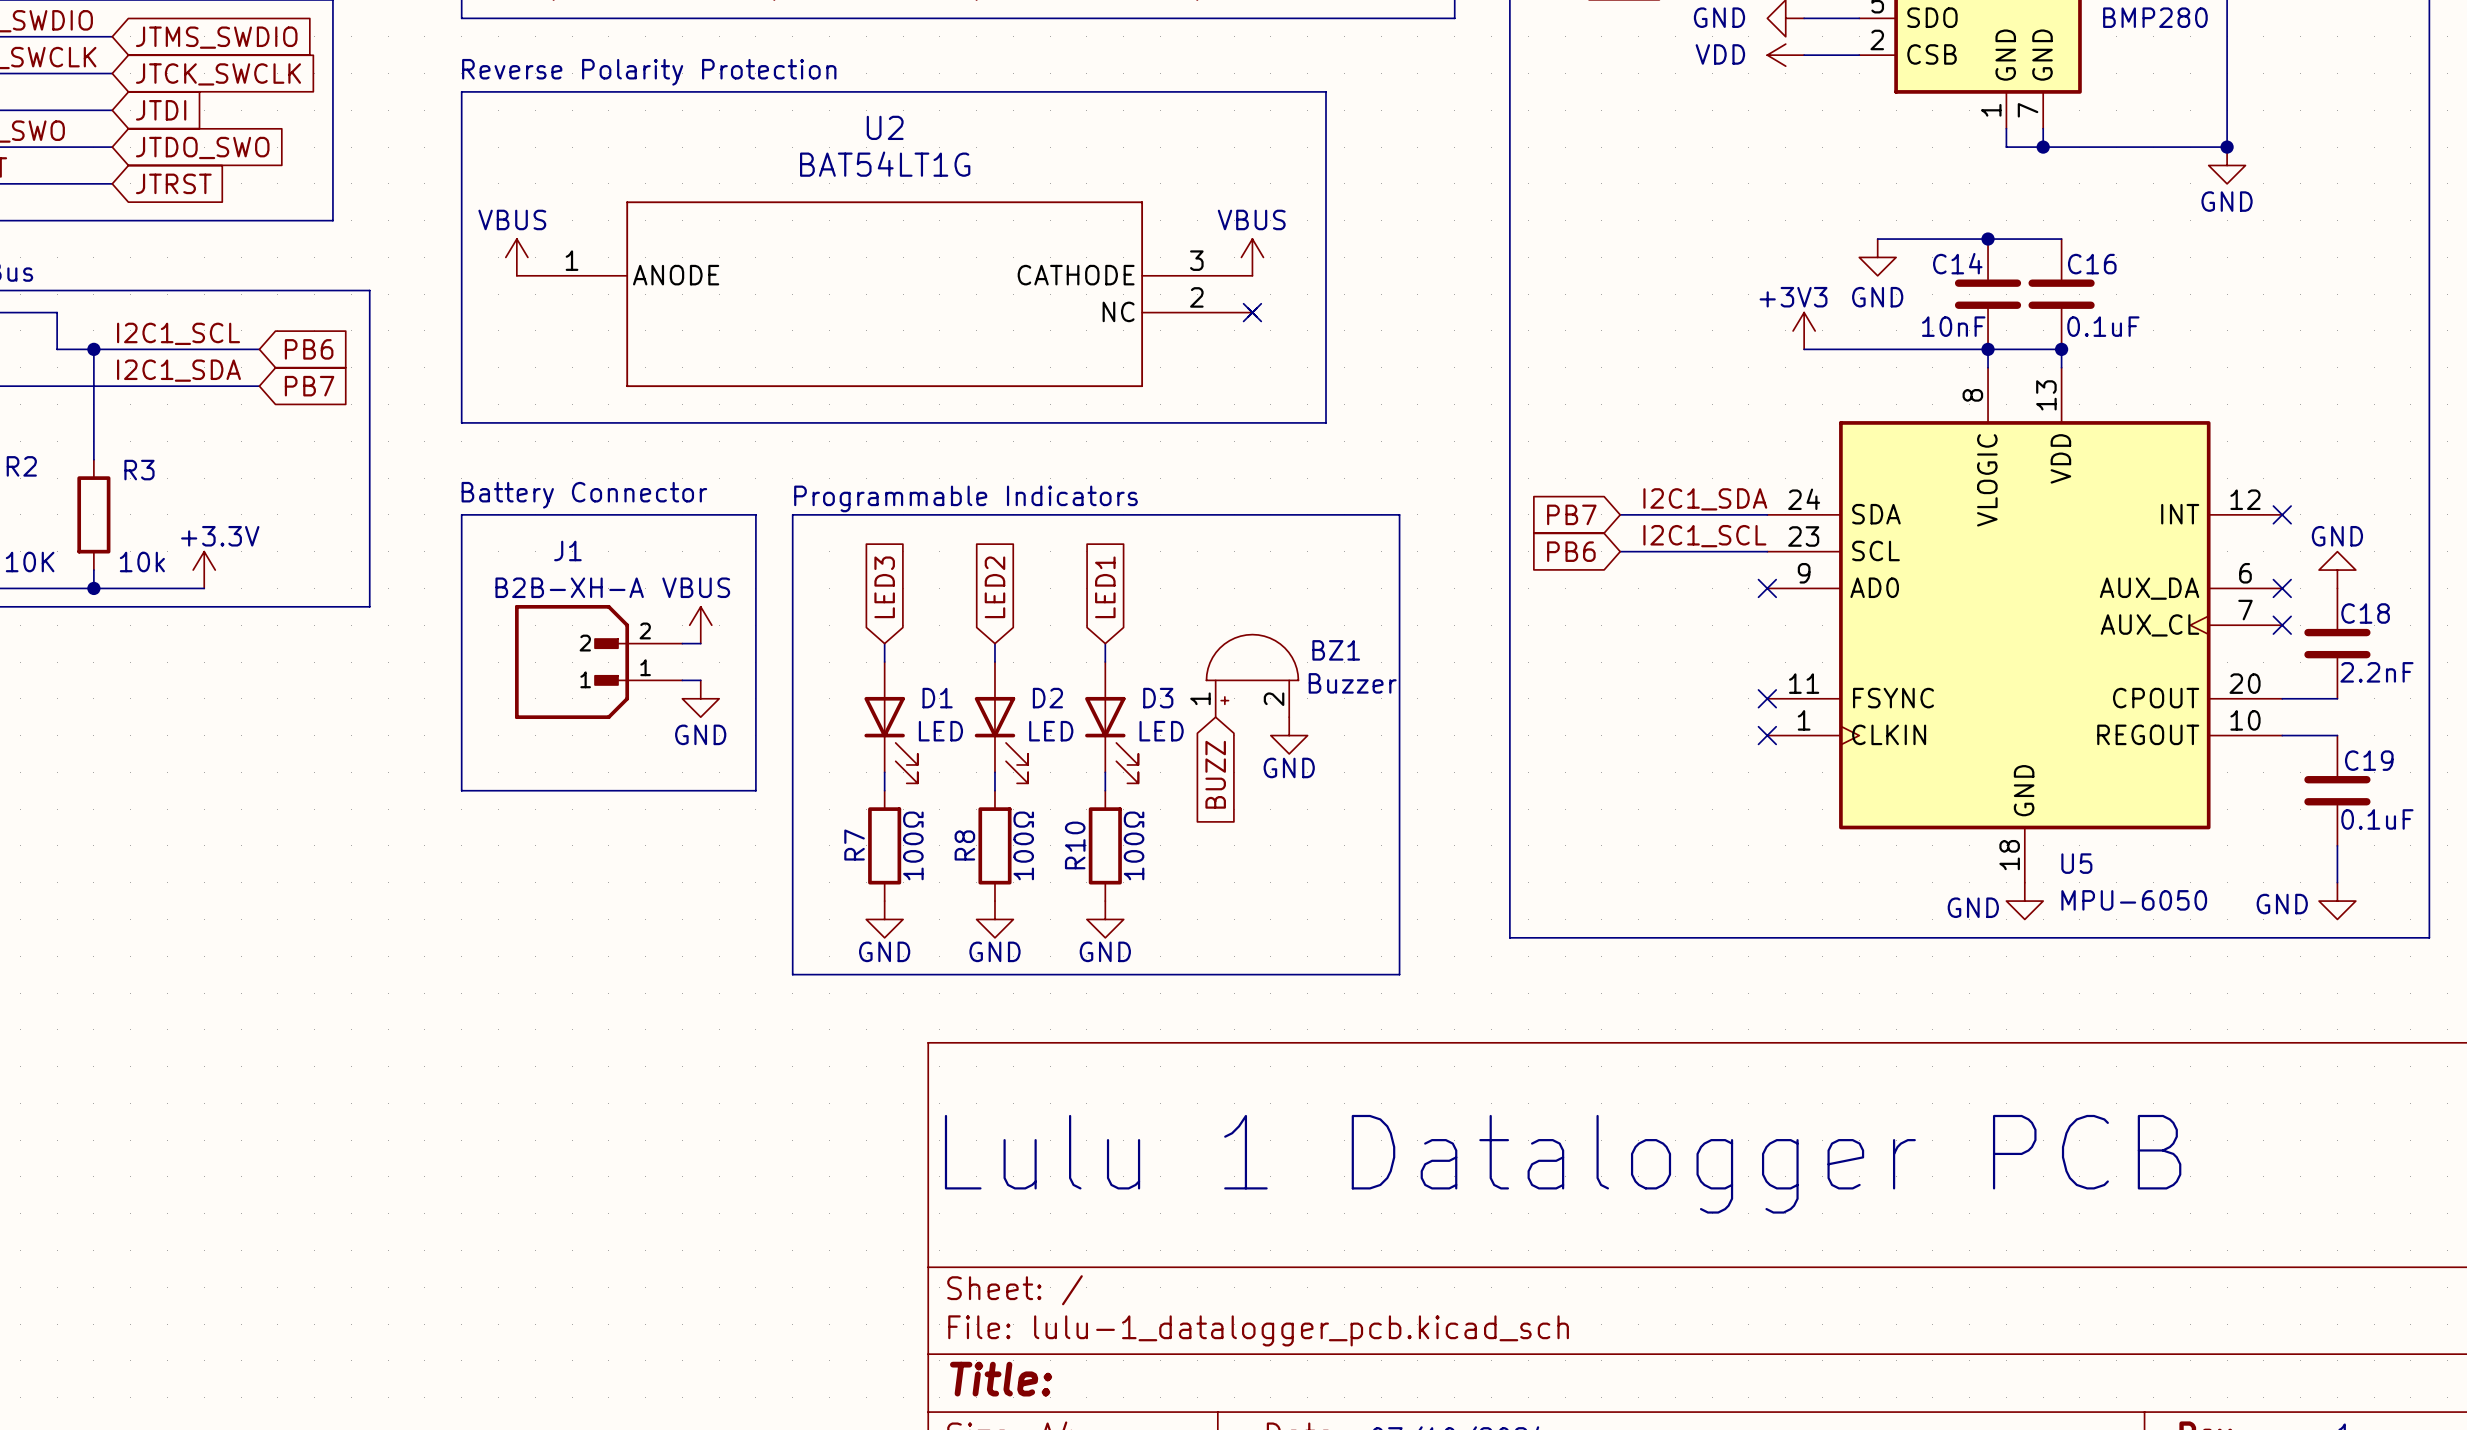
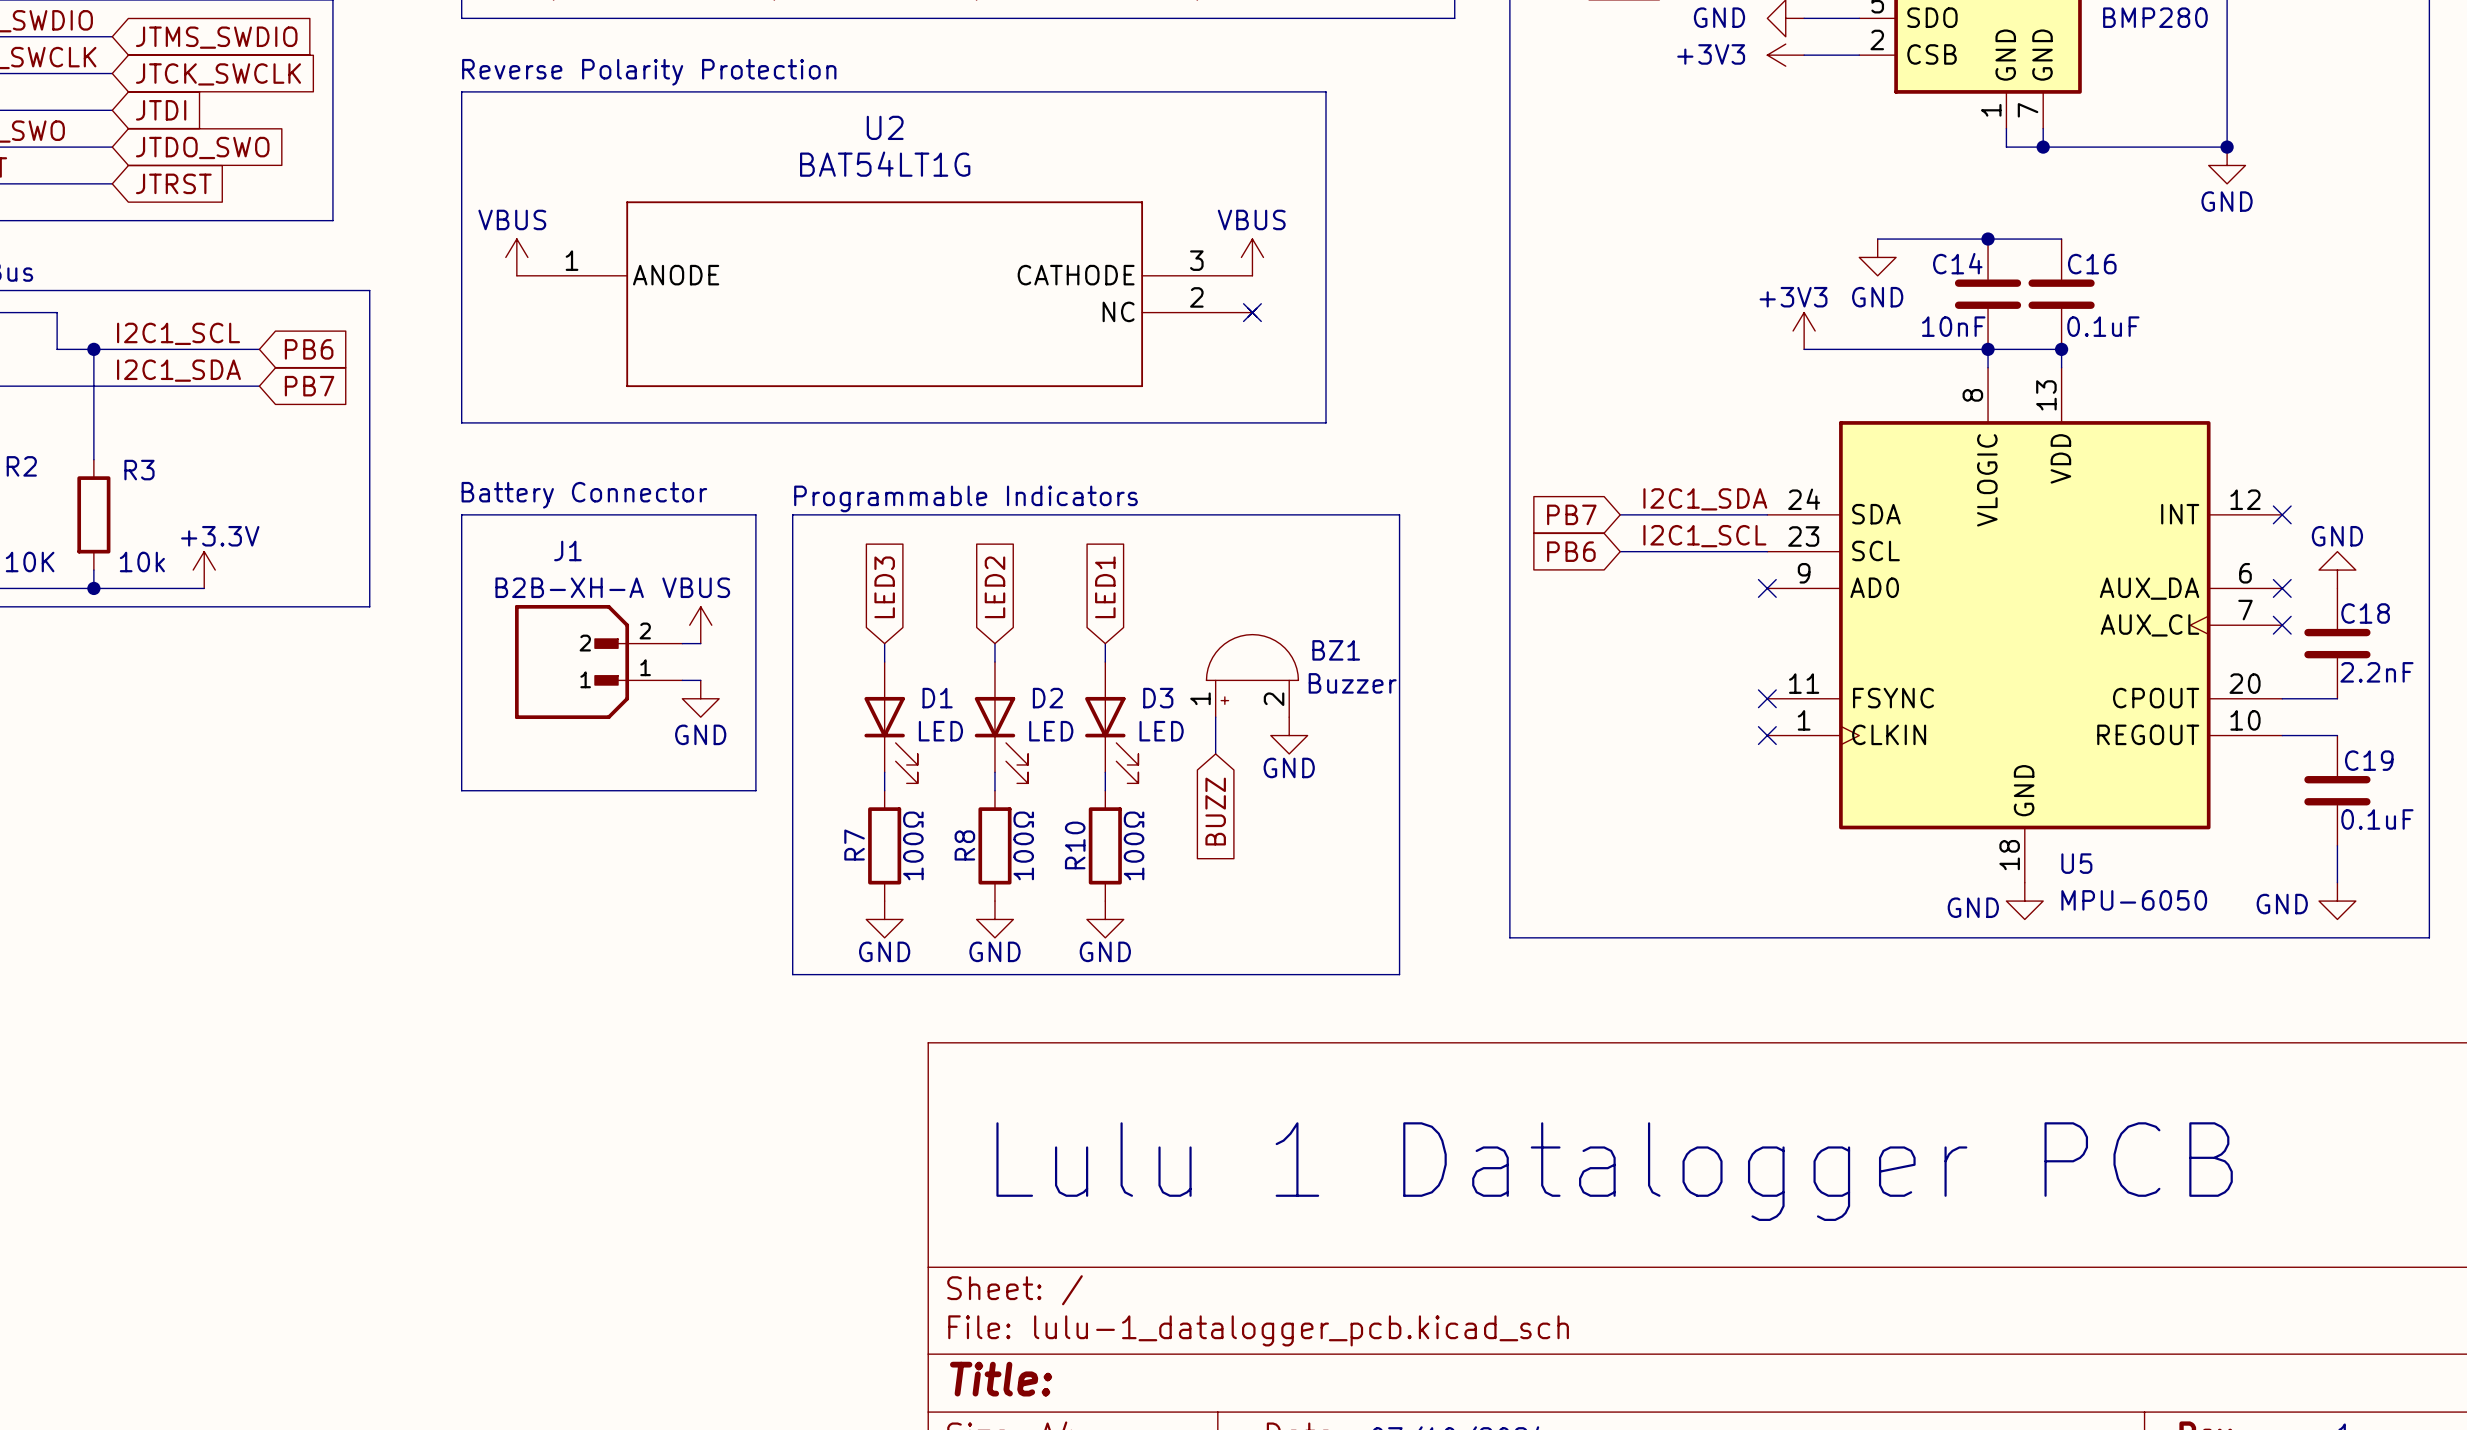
power symbol: VDD (1785, 55) -> +3V3 (1785, 55)
wire: none -> (1215, 717) (1215, 753)
global label position: BUZZ (1215, 774) -> BUZZ (1215, 811)
text position: Lulu 1 Datalogger PCB (1563, 1164) -> Lulu 1 Datalogger PCB (1614, 1171)

